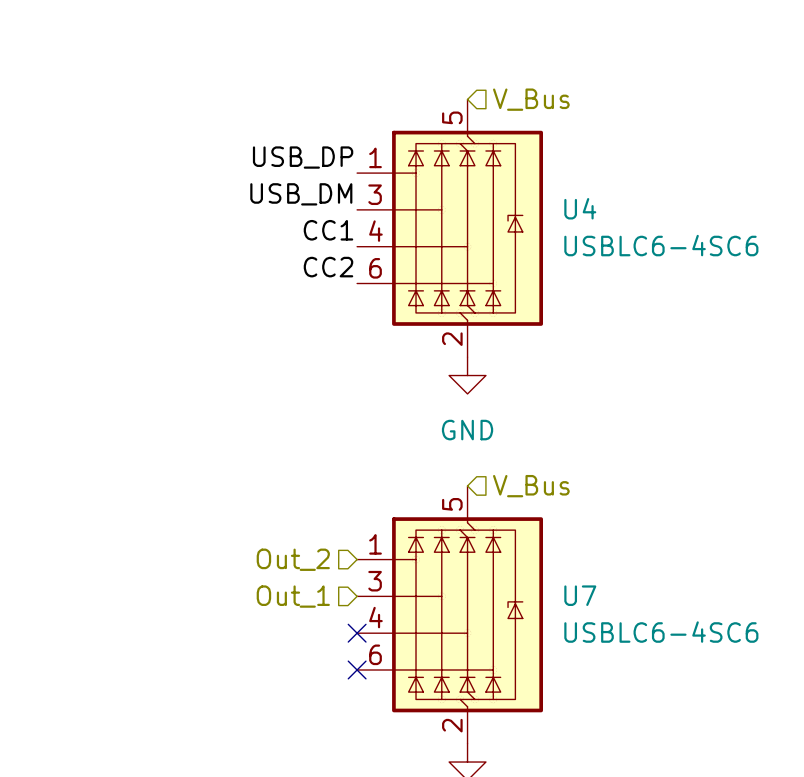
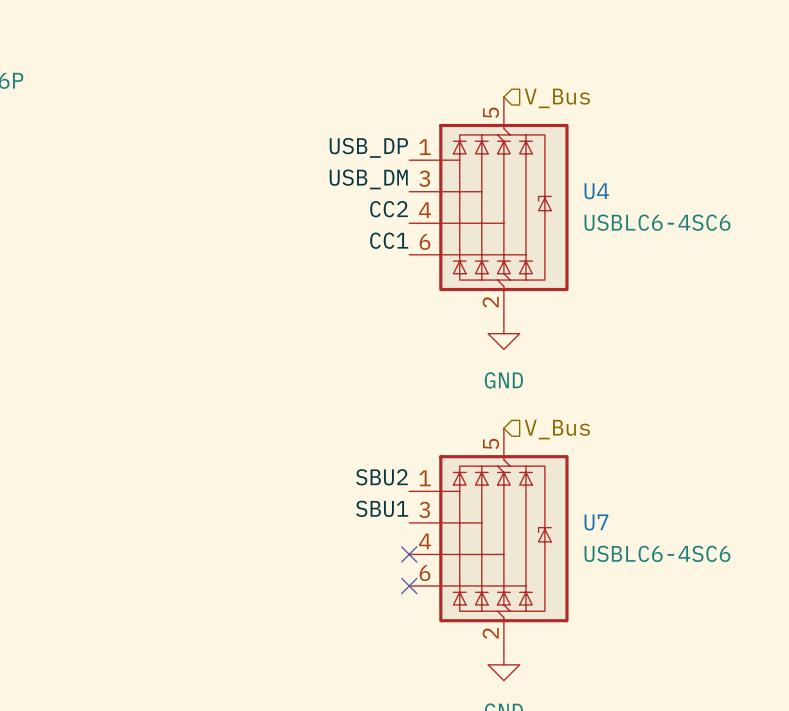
label: CC1 (328, 230) -> CC2 (389, 209)
label: CC2 (328, 267) -> CC1 (389, 240)
label: none -> SBU2 (381, 477)
hierarchical label: Out_2 (293, 559) -> none
label: none -> SBU1 (382, 508)
hierarchical label: Out_1 (293, 596) -> none

